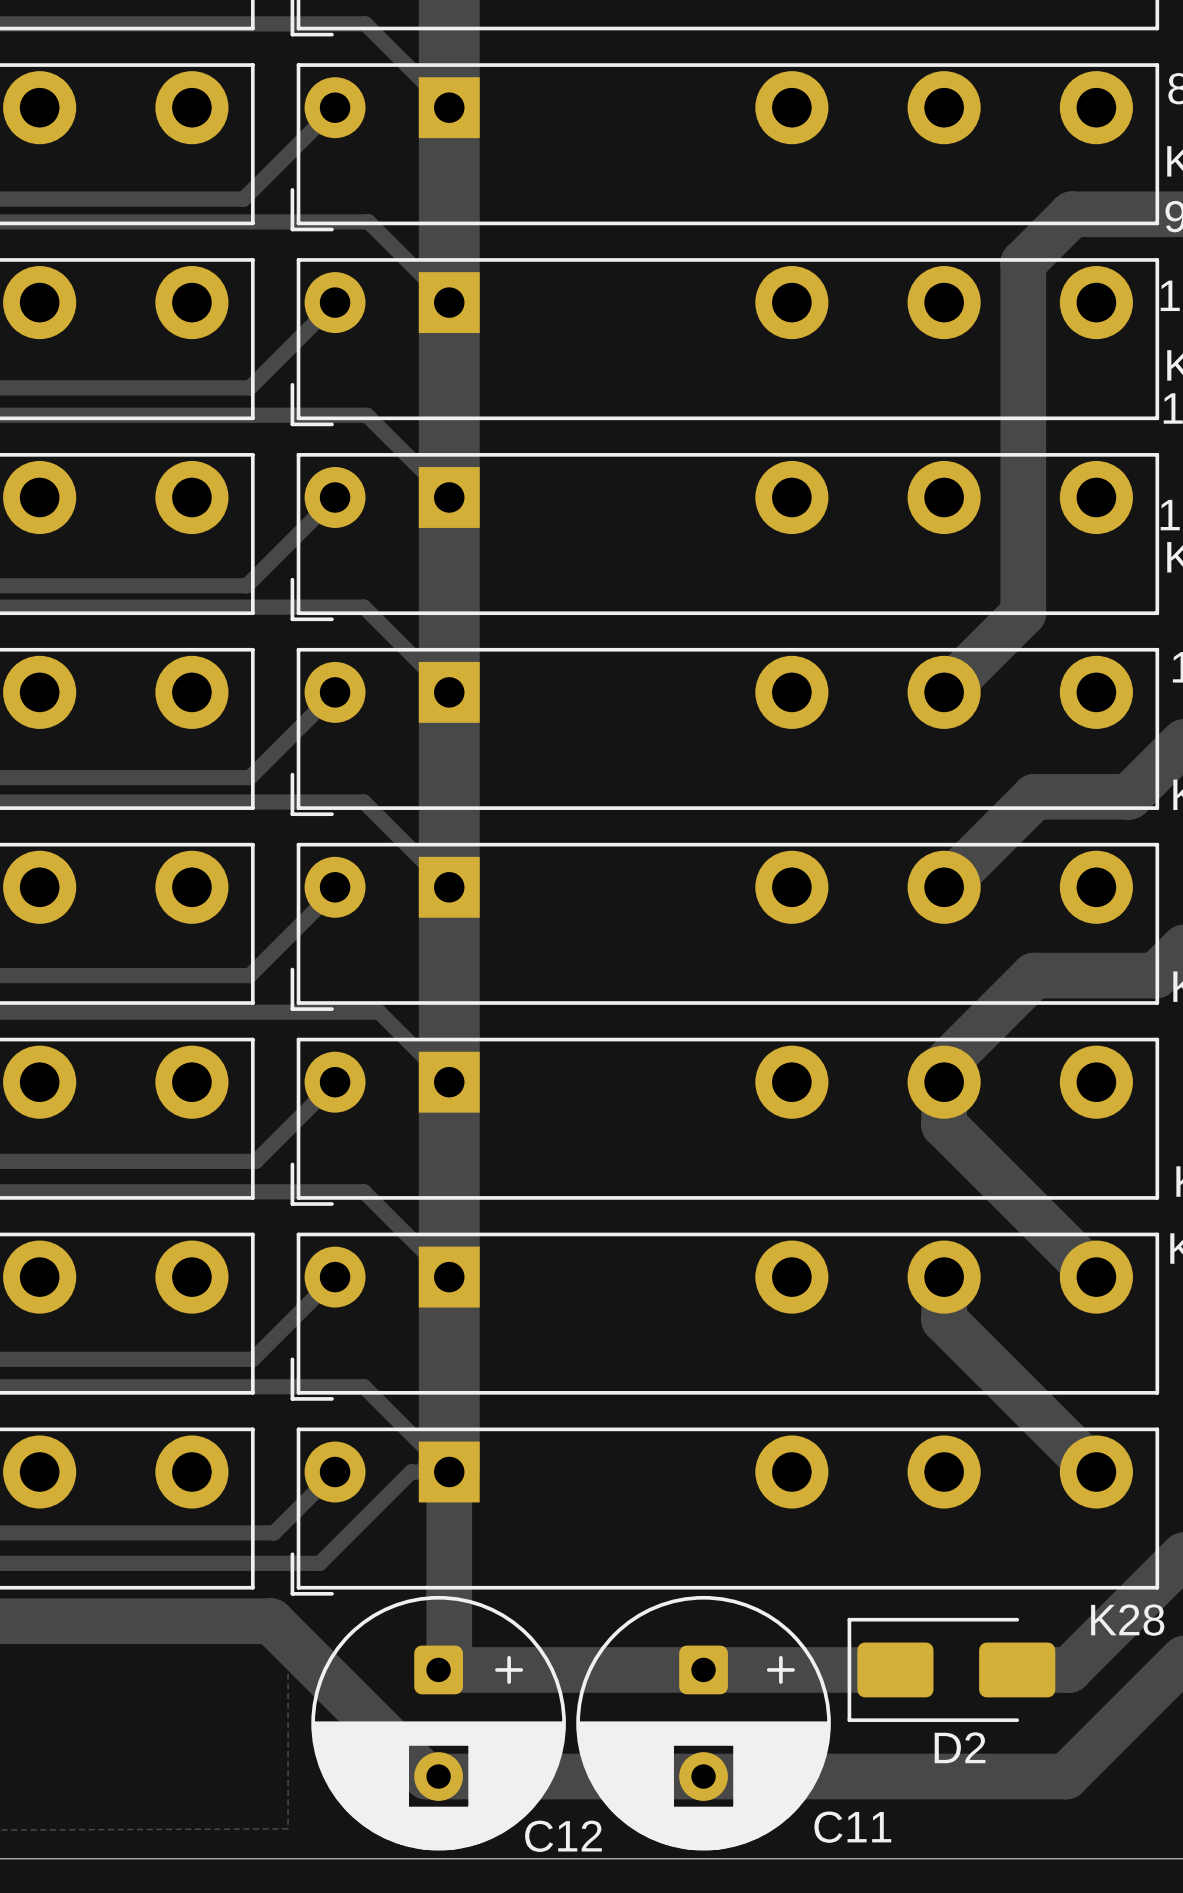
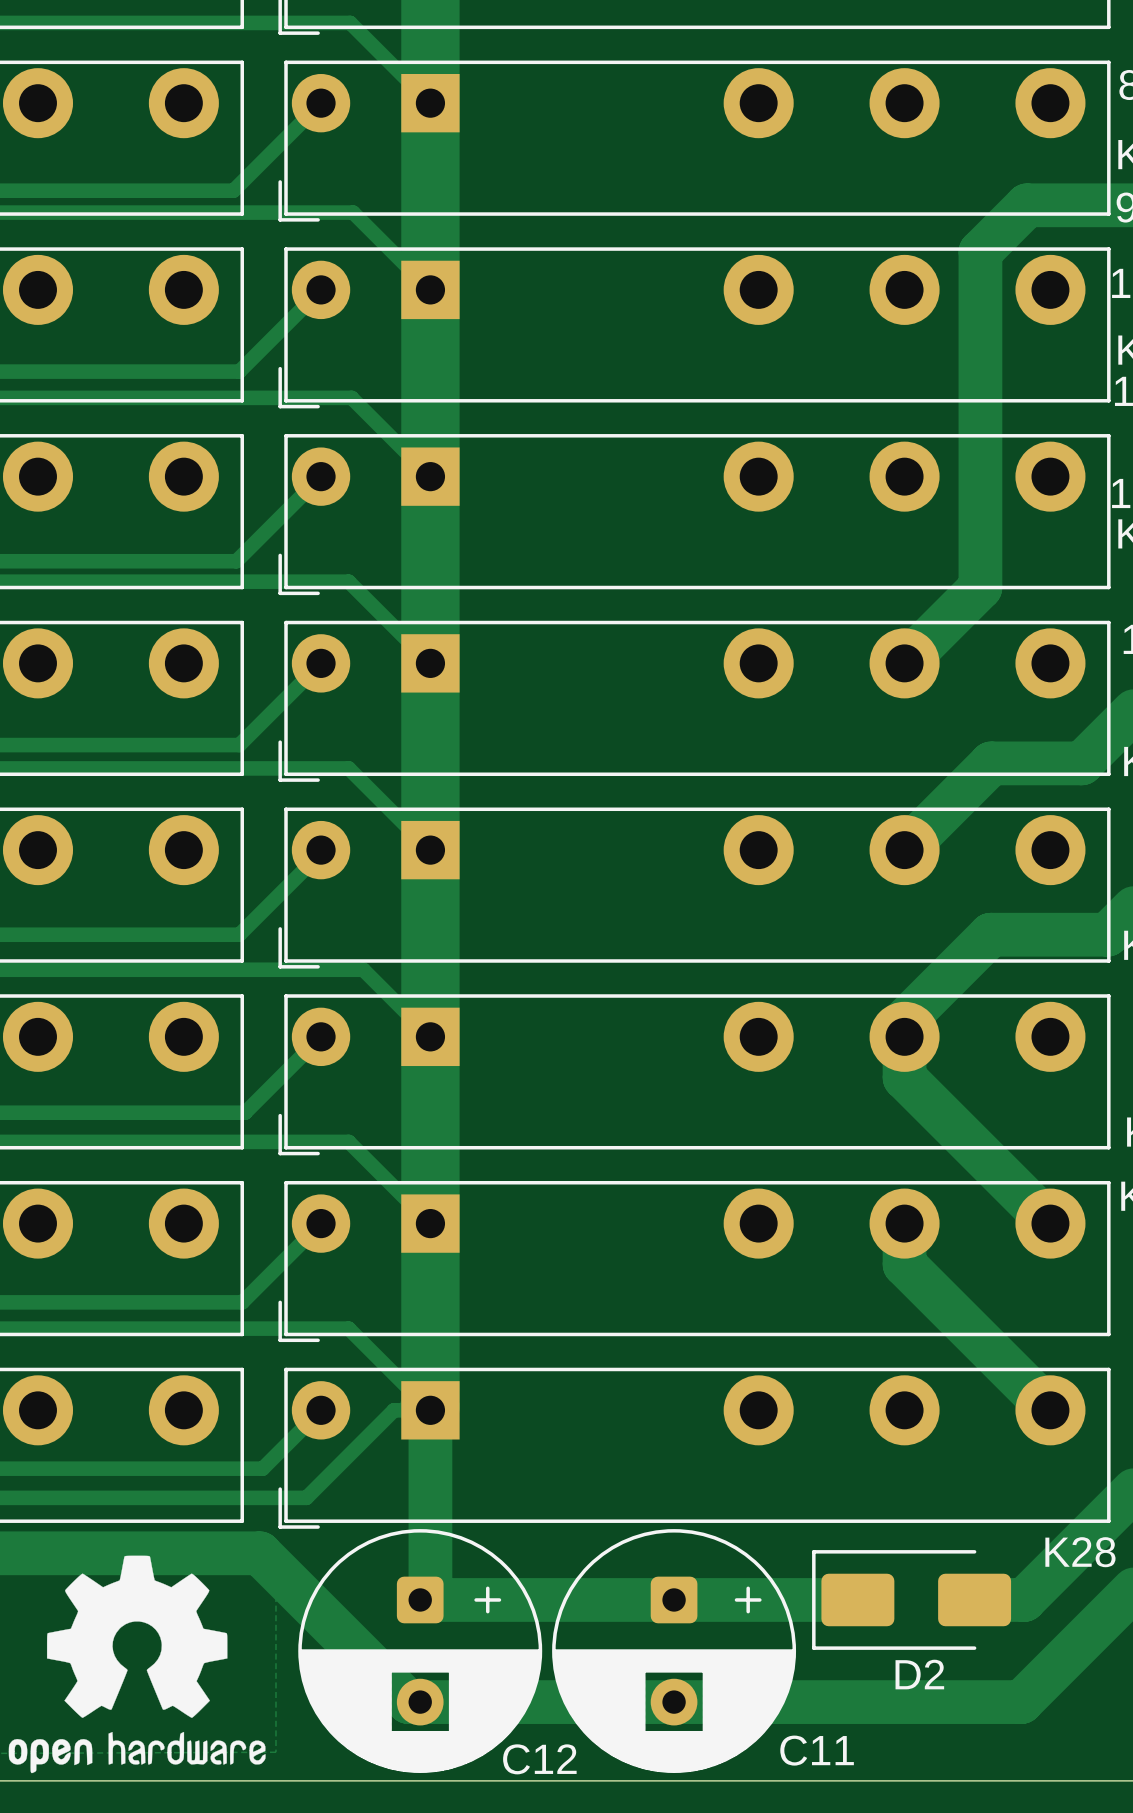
drawing: none -> [8, 1555, 266, 1774]

